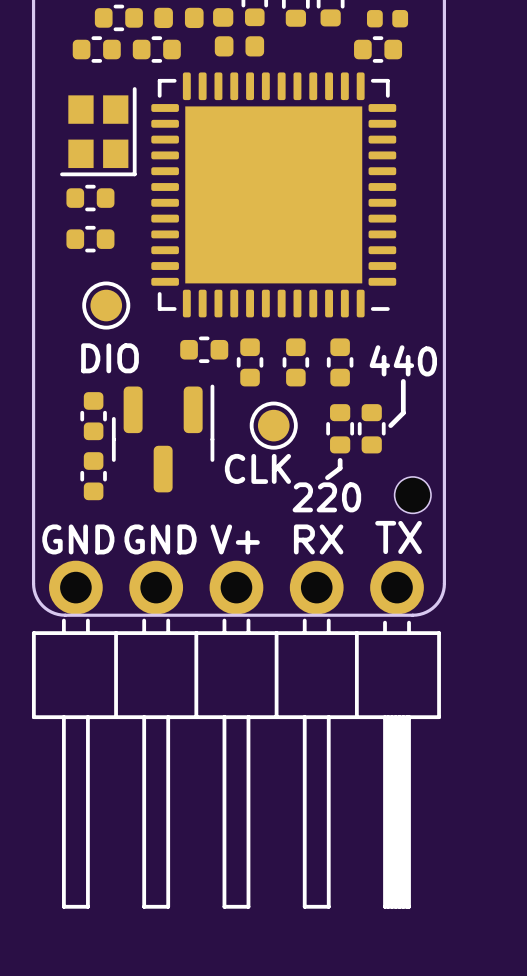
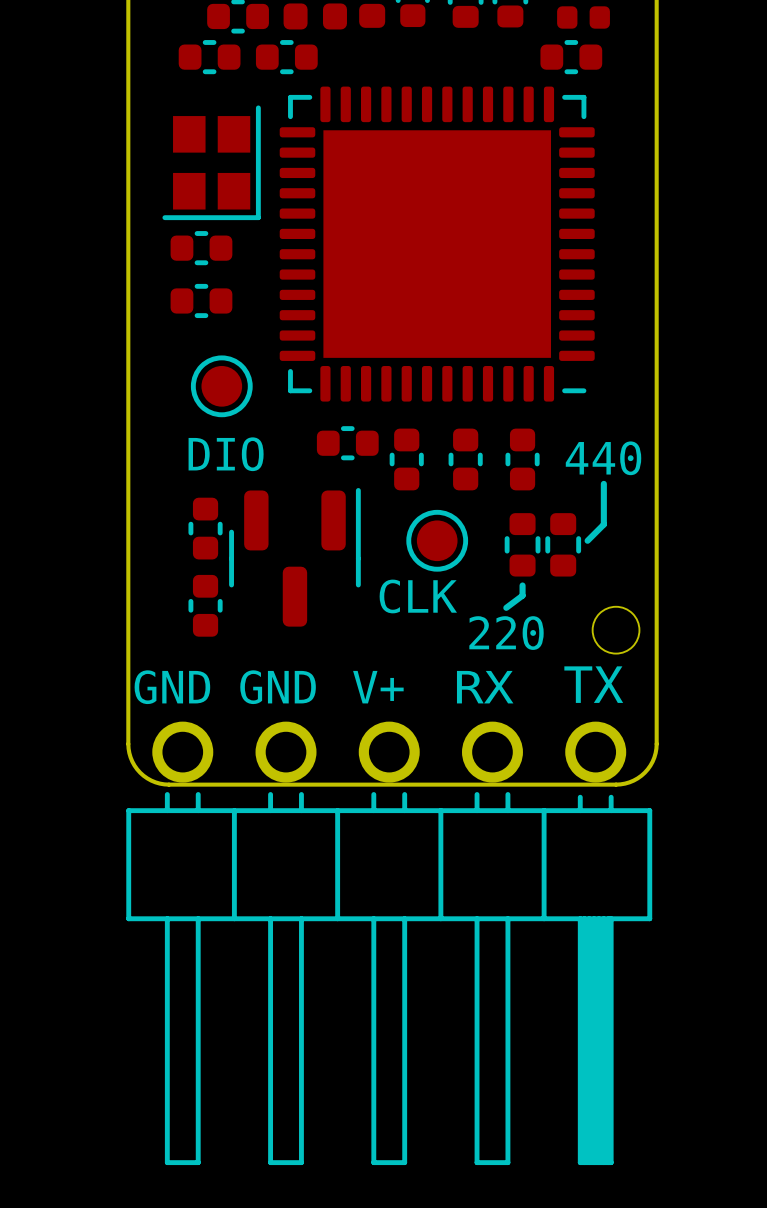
part: (239, 46) -> none
part footprint: [31, 560, 441, 909] -> [126, 721, 653, 1166]

